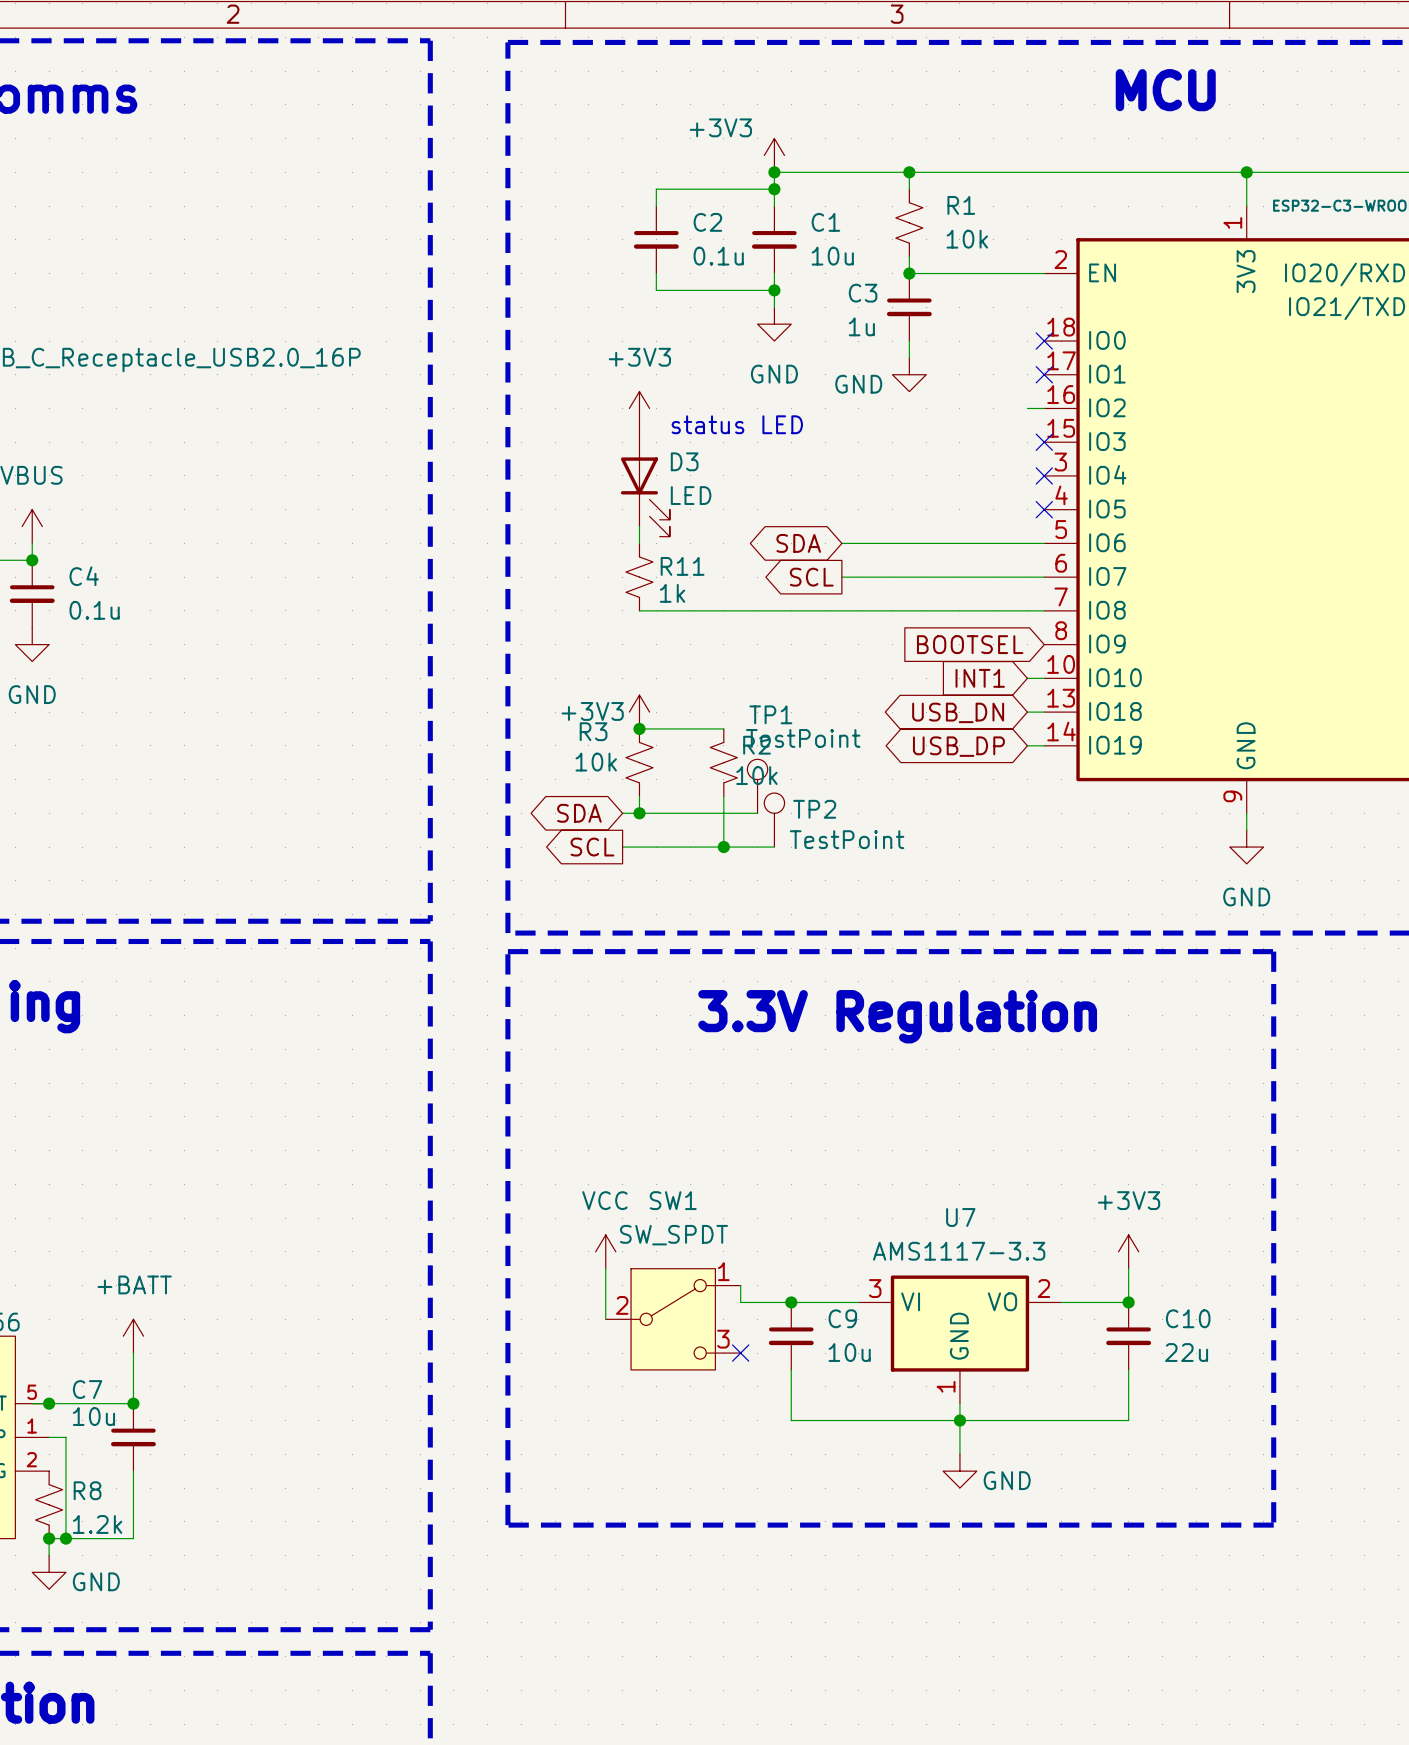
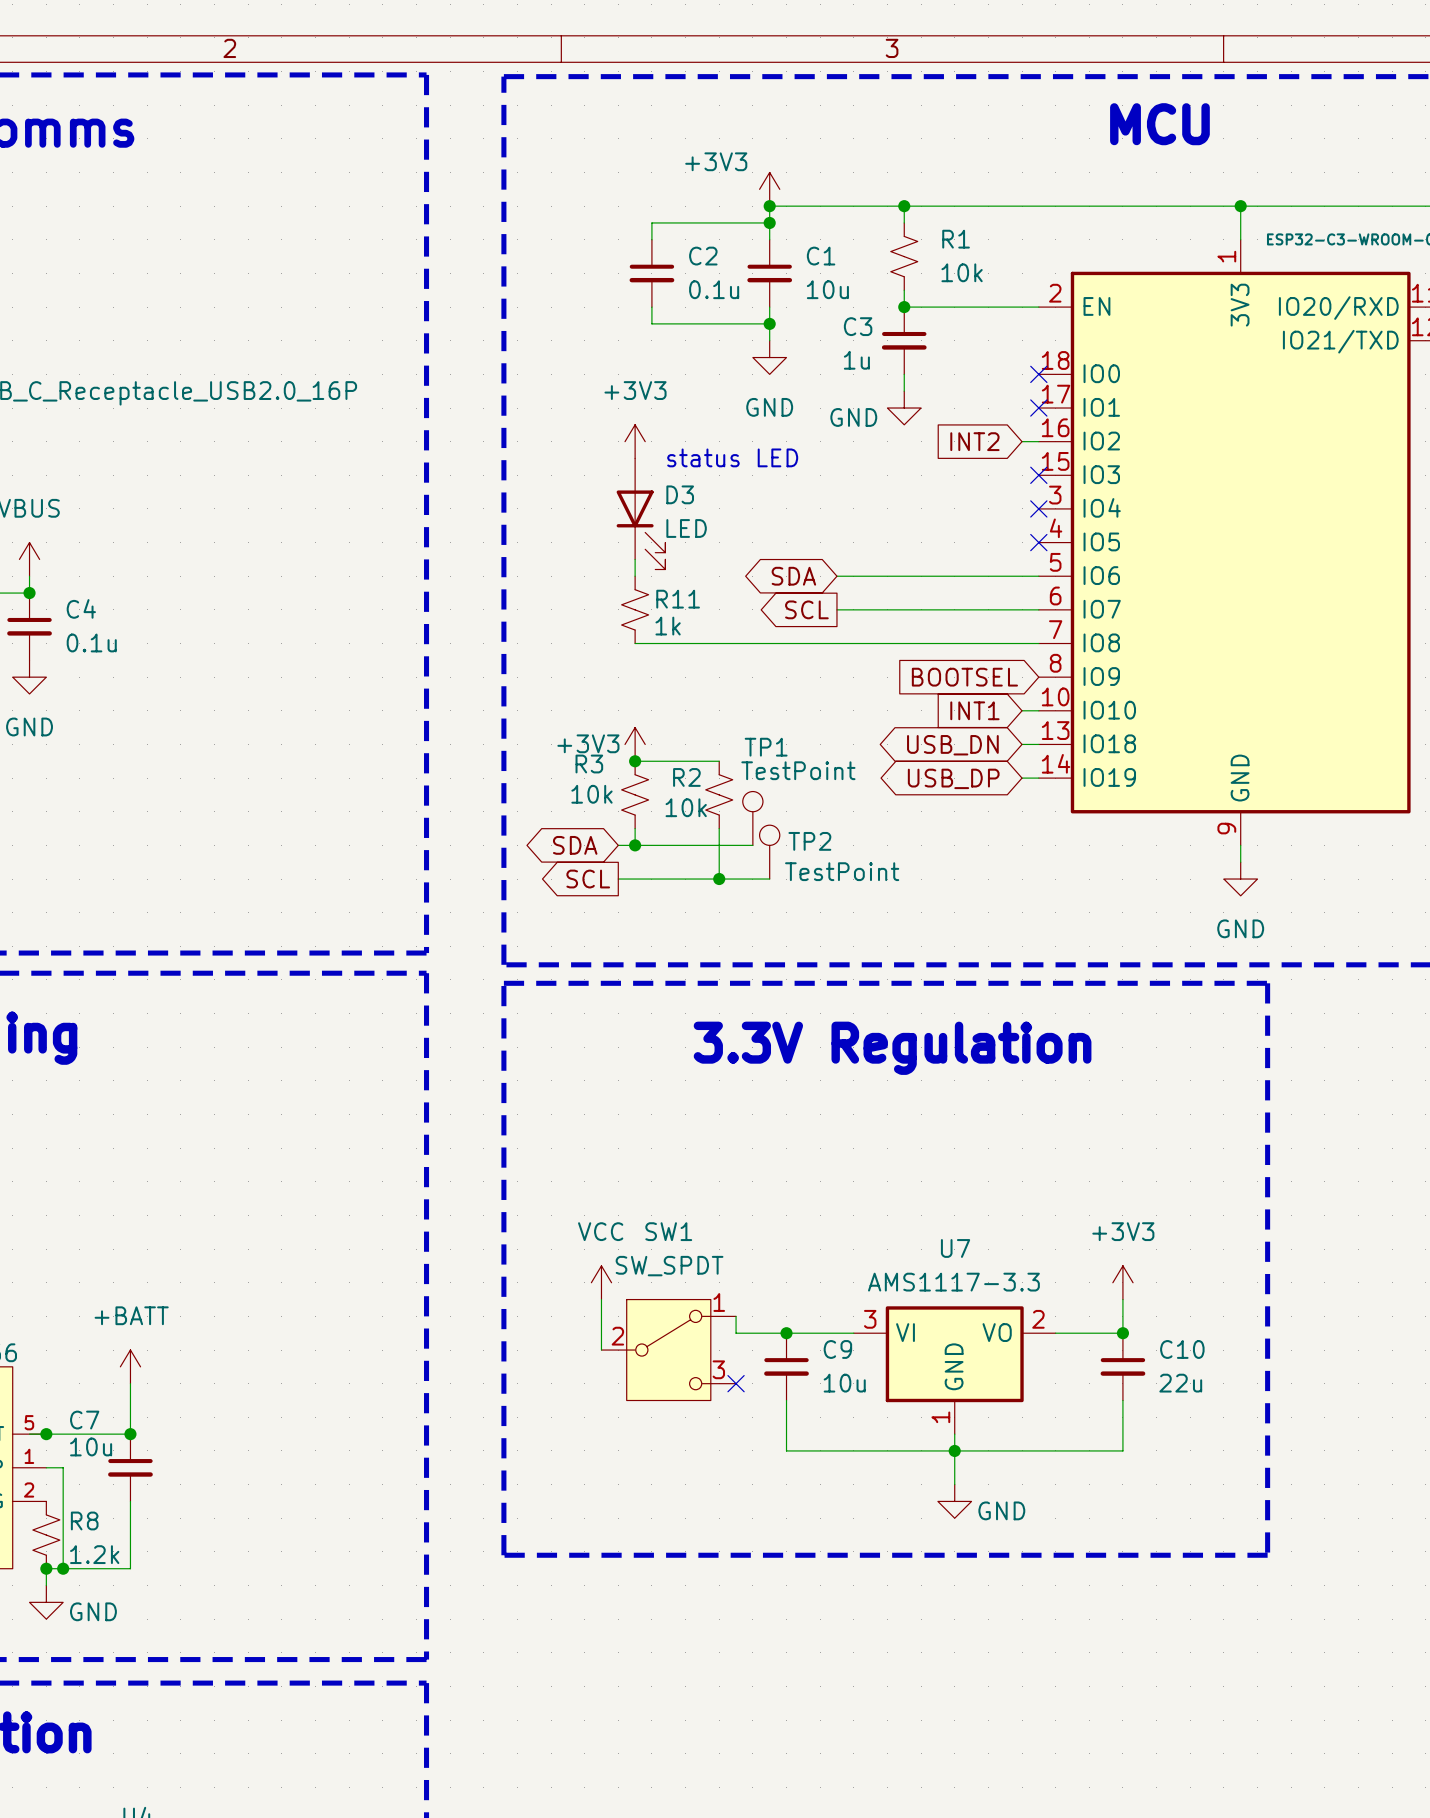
global label: none -> INT2 (974, 441)
R2 flip: as is (723, 762) -> left-right (719, 794)

